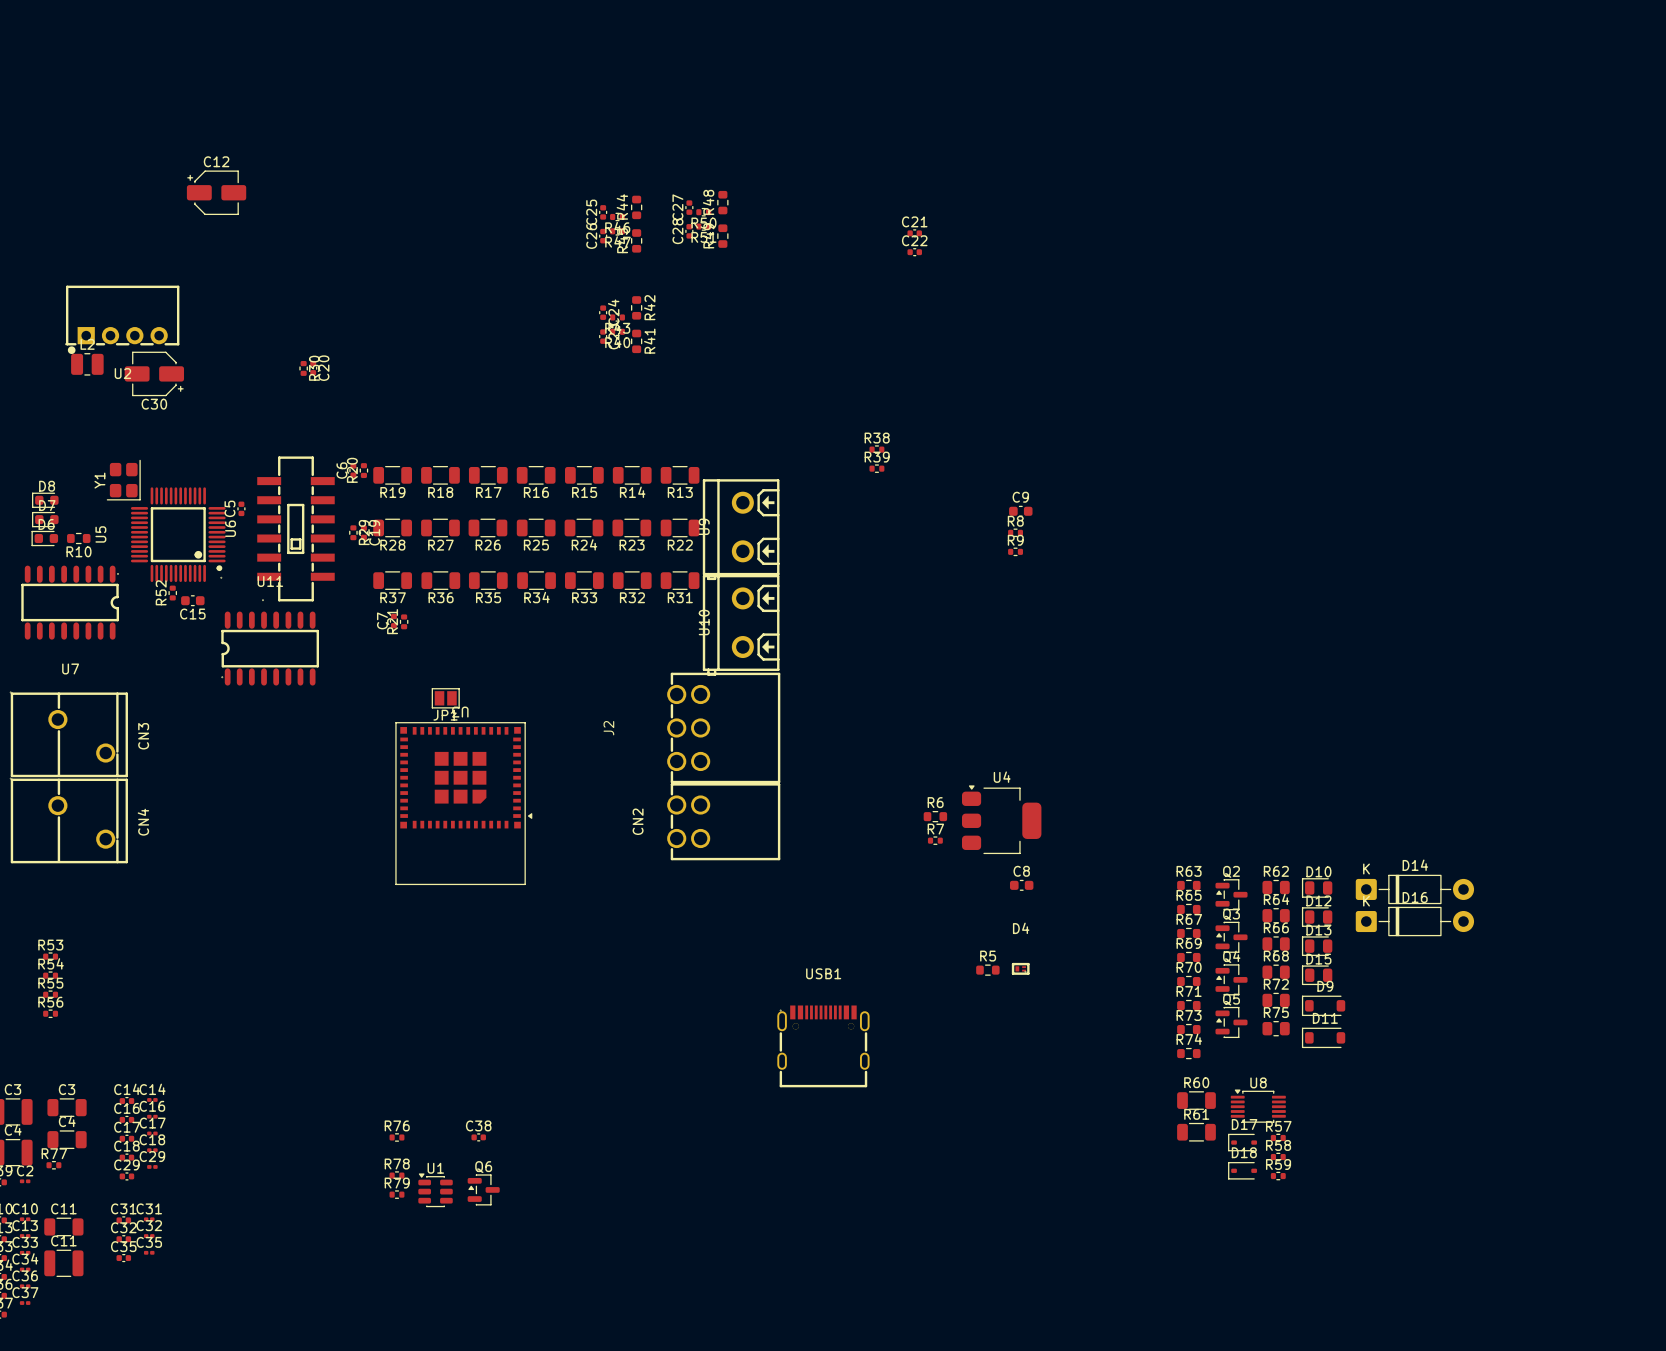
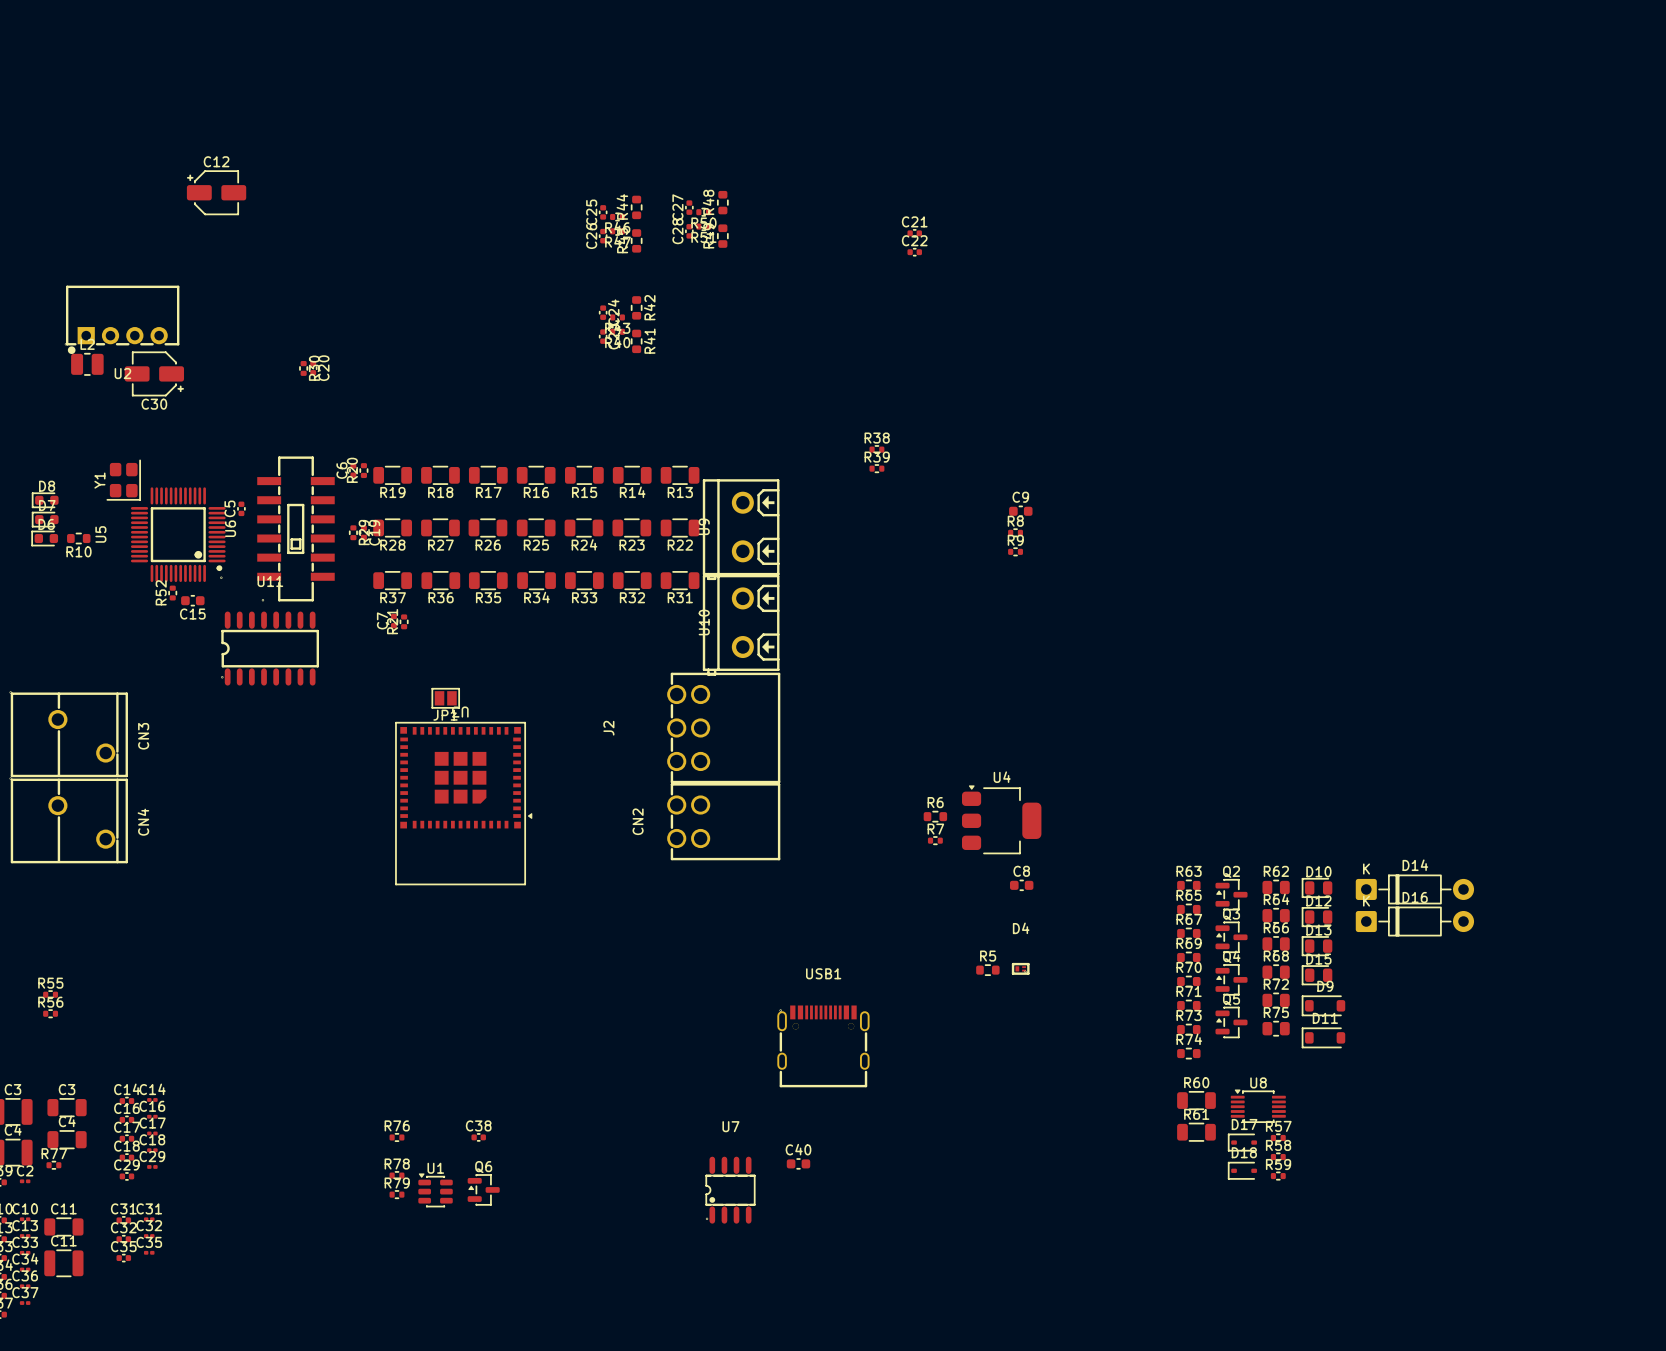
U7 footprint: [21, 565, 120, 640] -> [705, 1156, 756, 1224]
U7 name position: U7 (70, 668) -> U7 (730, 1126)
R53: (50, 956) -> none
R54: (50, 975) -> none
C40: none -> (798, 1163)

